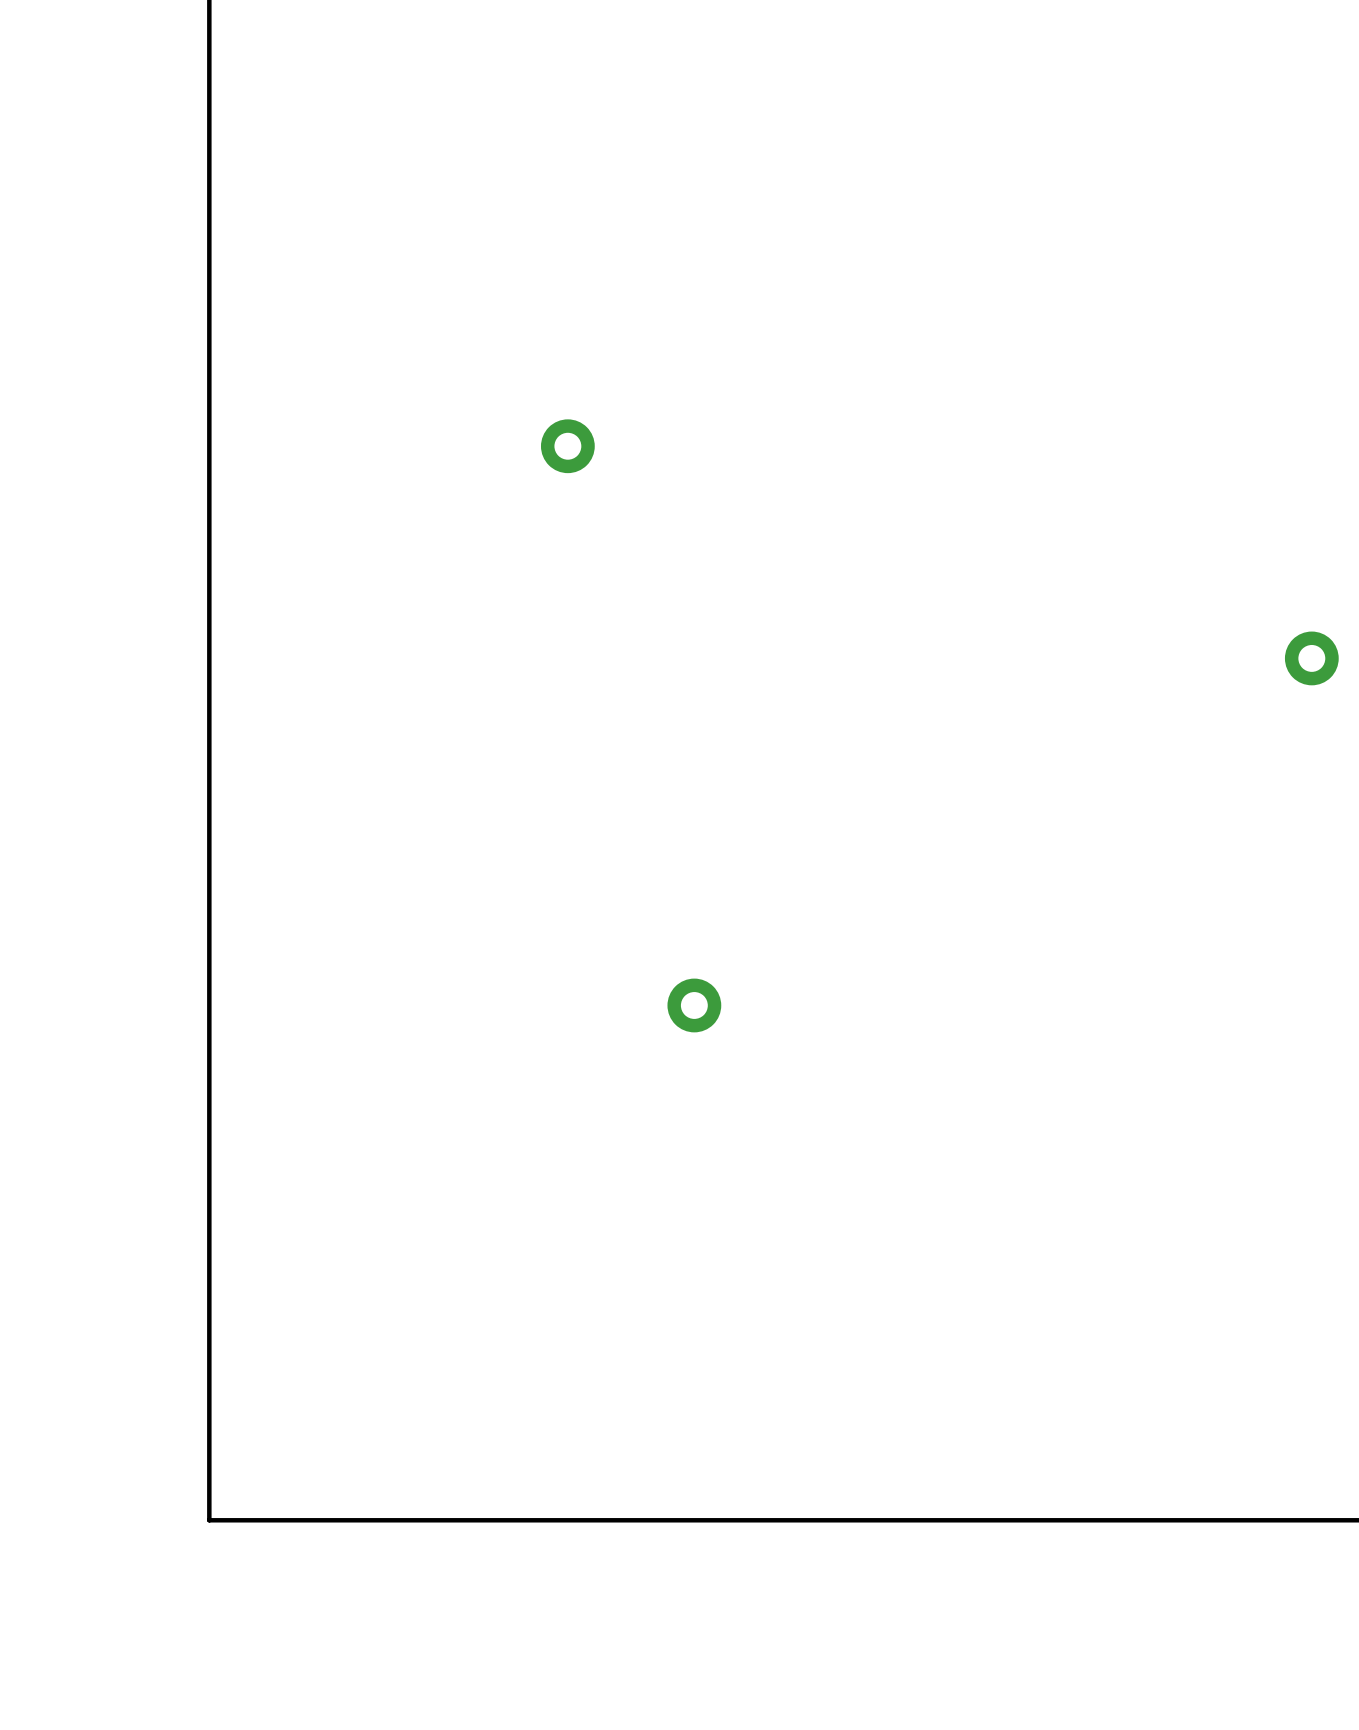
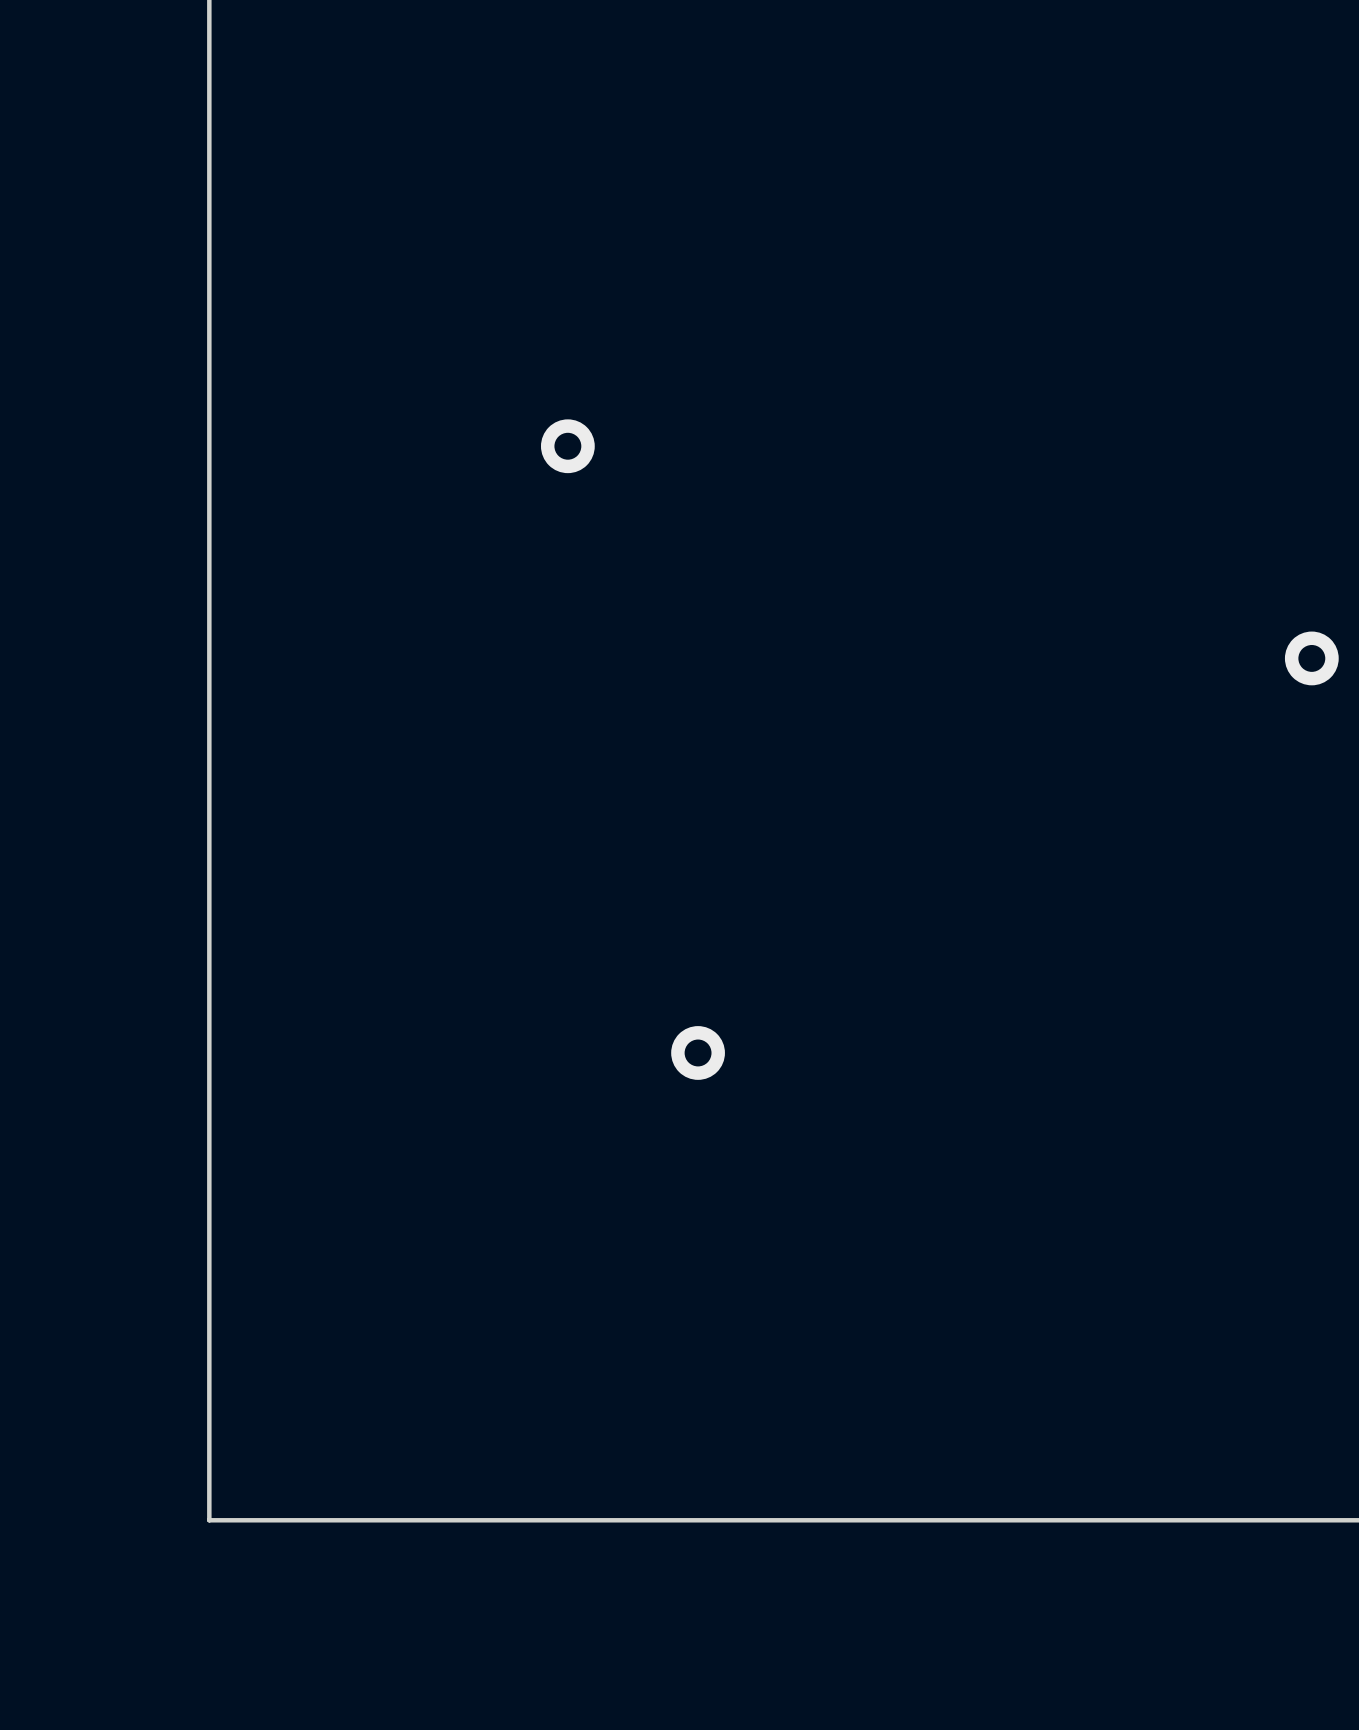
via position: (694, 1005) -> (698, 1052)

